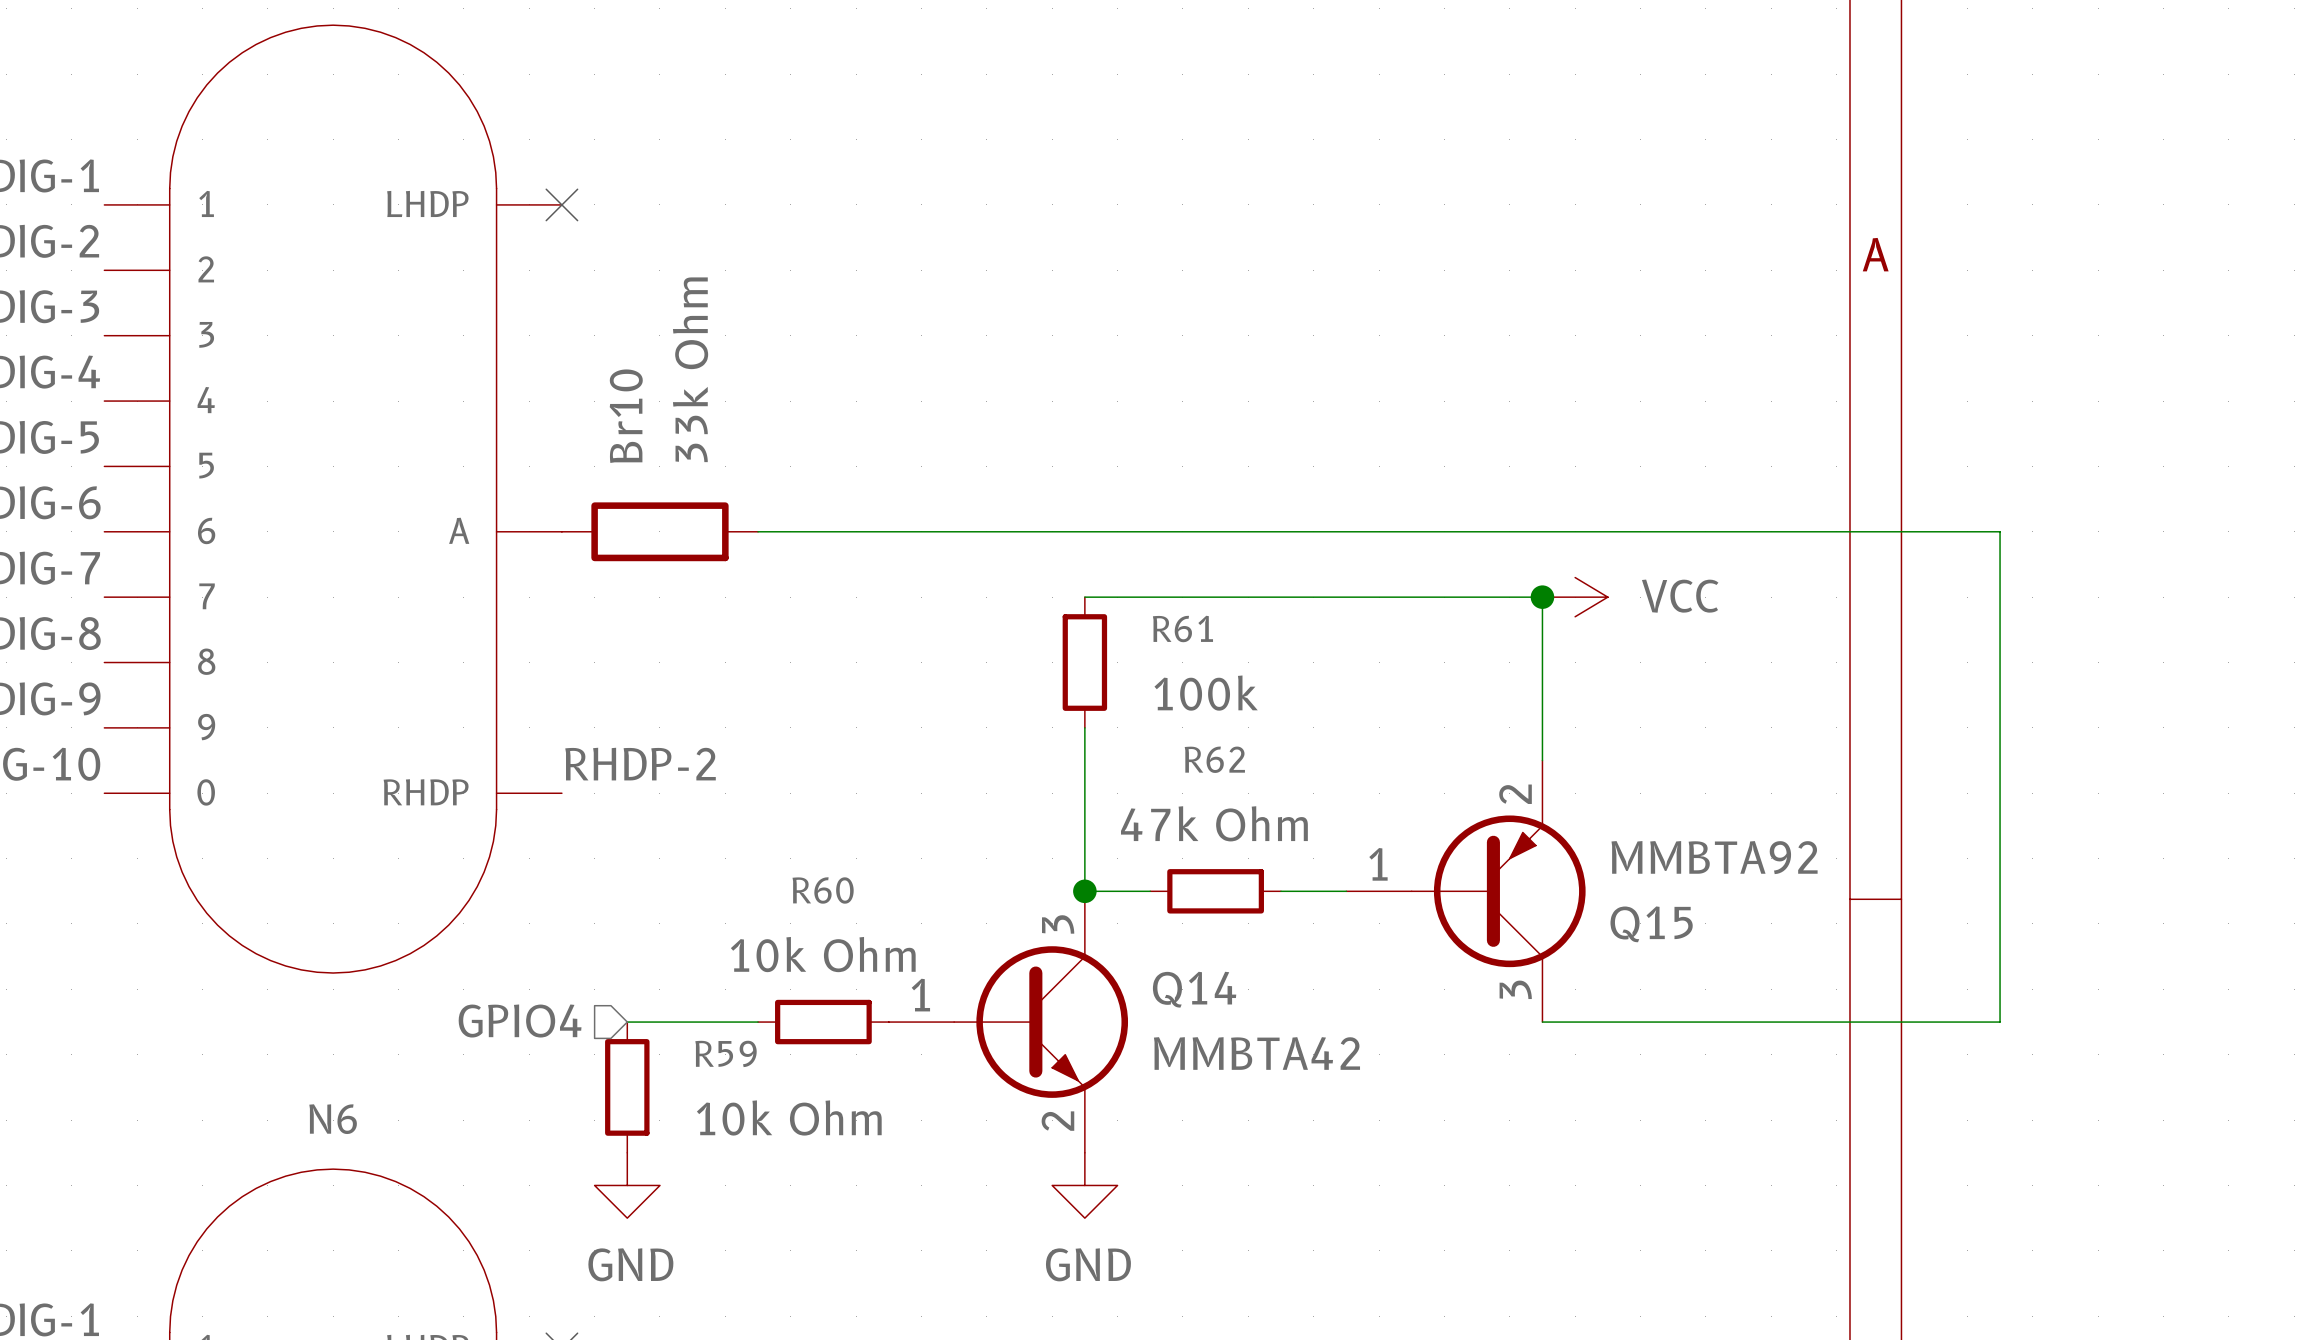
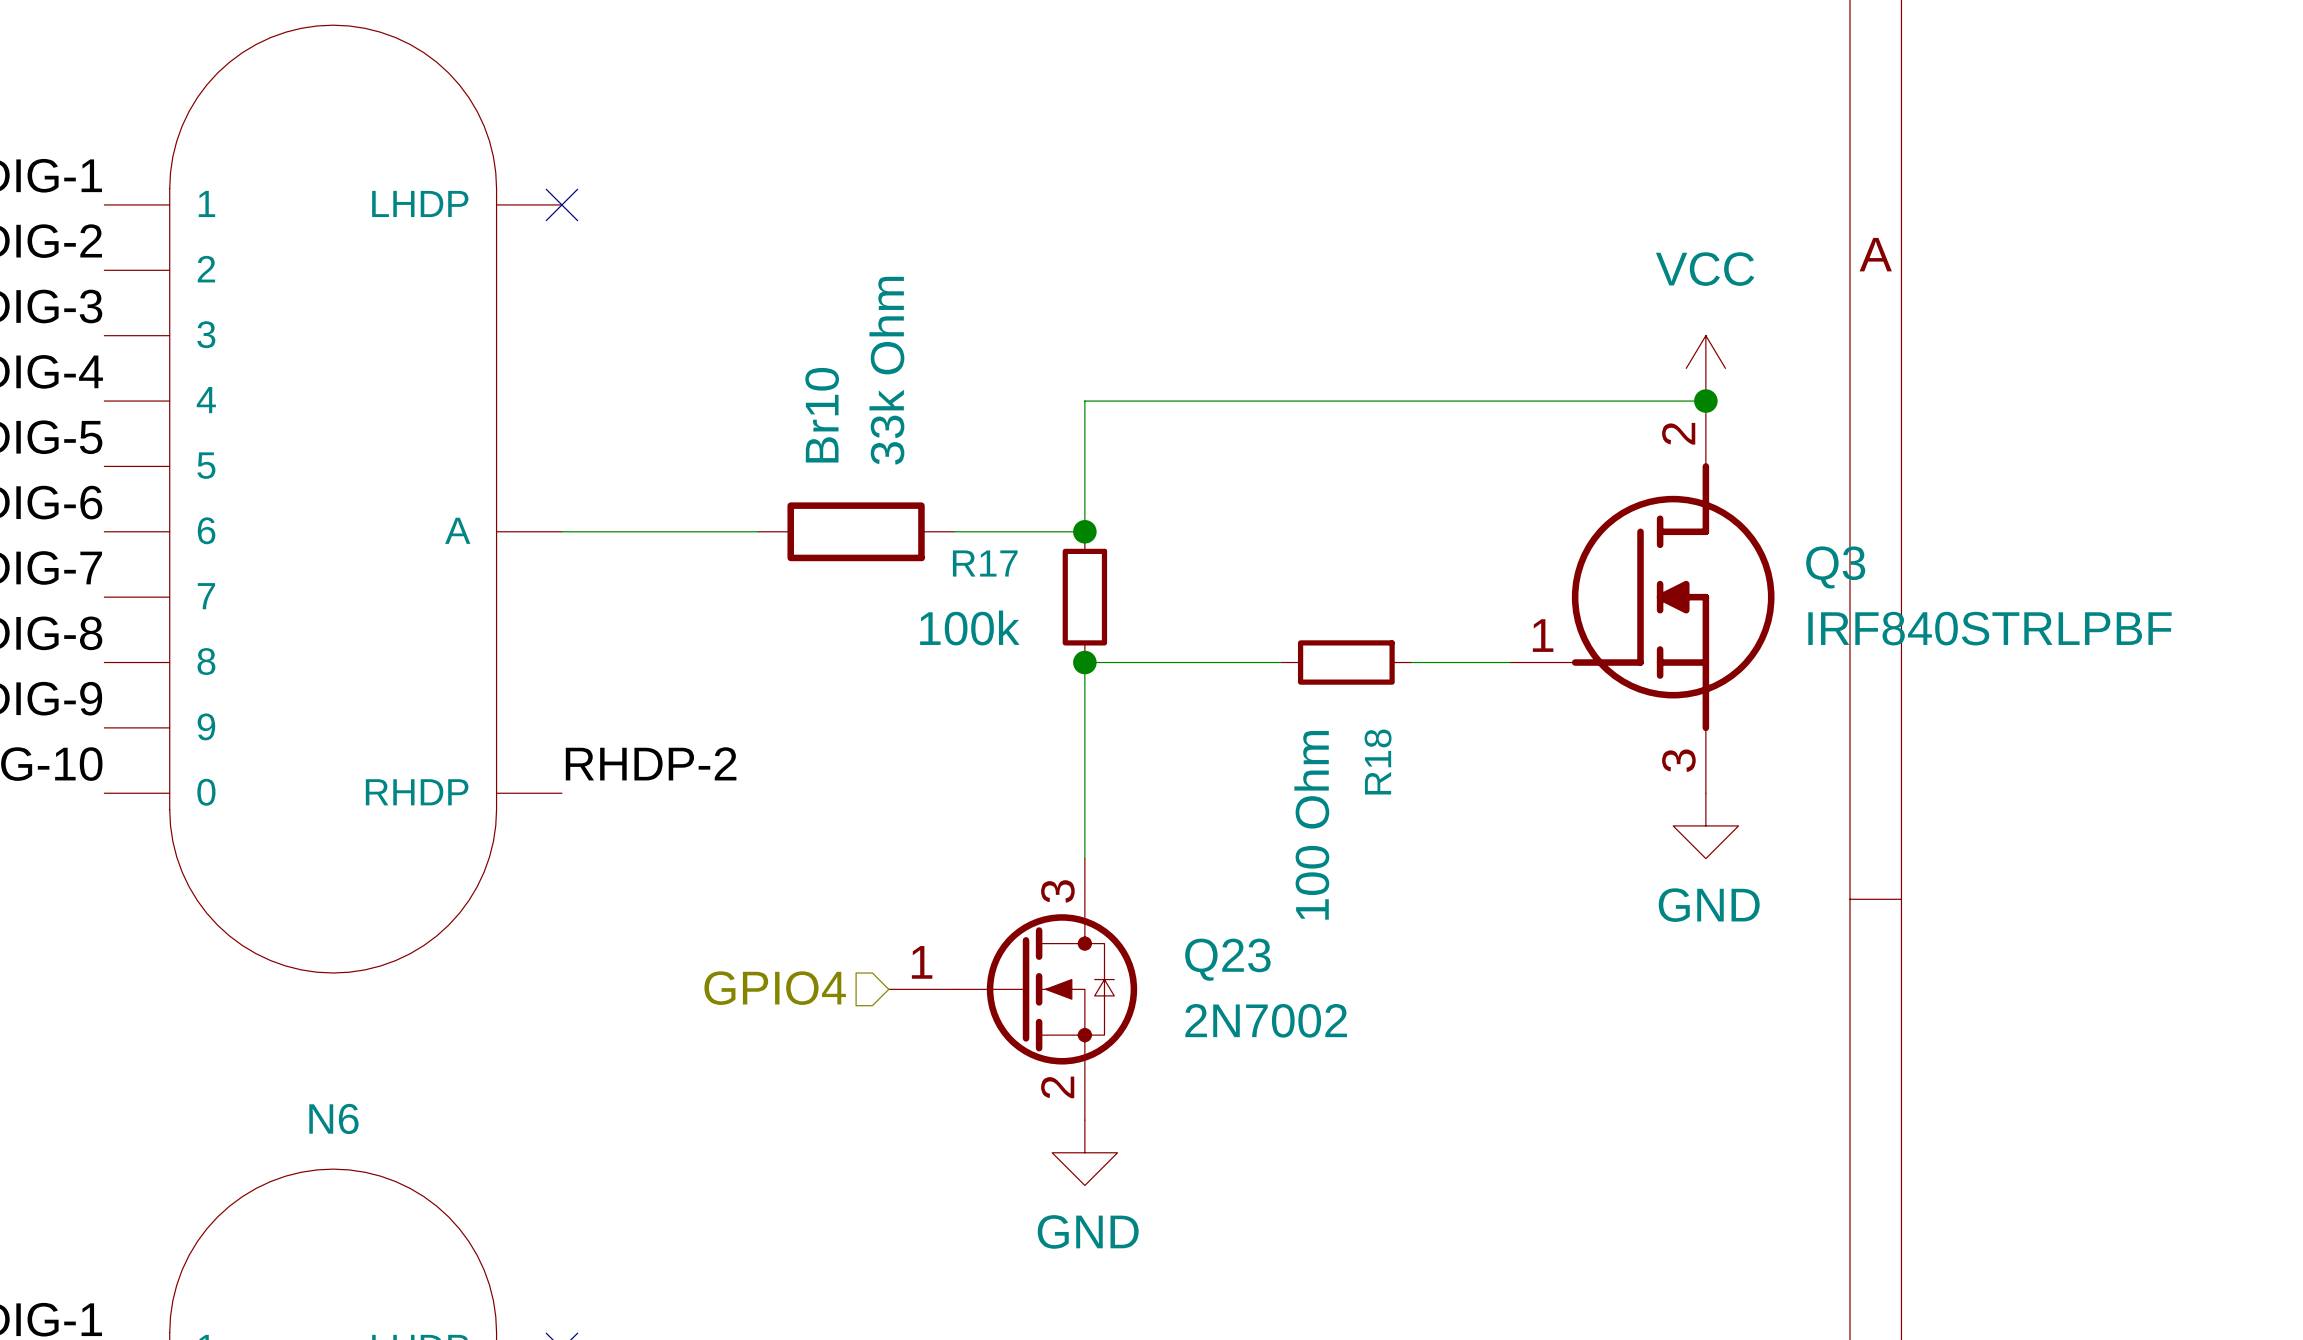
junction: none -> (1705, 401)
Br10 position: (659, 531) -> (856, 531)
wire: (758, 531) (954, 531) -> (758, 531) (561, 531)
wire: (1084, 531) (2000, 531) (2000, 1022) (1542, 1022) -> (1084, 531) (1084, 401) (1705, 401)
junction: none -> (1084, 531)
wire: (1084, 597) (1542, 597) (1542, 760) -> none
R17: none -> 100k (1084, 597)
junction: (1542, 597) -> none
power symbol rotation: 0° (1575, 597) -> 90° counterclockwise (1705, 368)
power symbol position: VCC (1575, 597) -> VCC (1705, 368)
Q3: none -> IRF840STRLPBF (1642, 597)
junction: none -> (1084, 662)
R61: 100k (1084, 662) -> none
wire: none -> (1280, 662) (1084, 662) (1084, 727)
R18: none -> 100 Ohm (1346, 662)
wire: none -> (1411, 662) (1509, 662)
power symbol: none -> GND (1705, 825)
wire: (1084, 858) (1084, 891) (1150, 891) -> none
junction: (1084, 891) -> none
R62: 47k Ohm (1215, 891) -> none
wire: (1280, 891) (1346, 891) -> none
Q15: MMBTA92 (1465, 891) -> none
Q23: none -> 2N7002 (1012, 989)
hierarchical label position: GPIO4 (520, 1021) -> GPIO4 (775, 988)
wire: (627, 1022) (758, 1022) -> none
R60: 10k Ohm (823, 1022) -> none
Q14: MMBTA42 (1008, 1022) -> none
R59: 10k Ohm (627, 1087) -> none
power symbol: GND (627, 1185) -> none
power symbol position: GND (1084, 1185) -> GND (1084, 1152)

